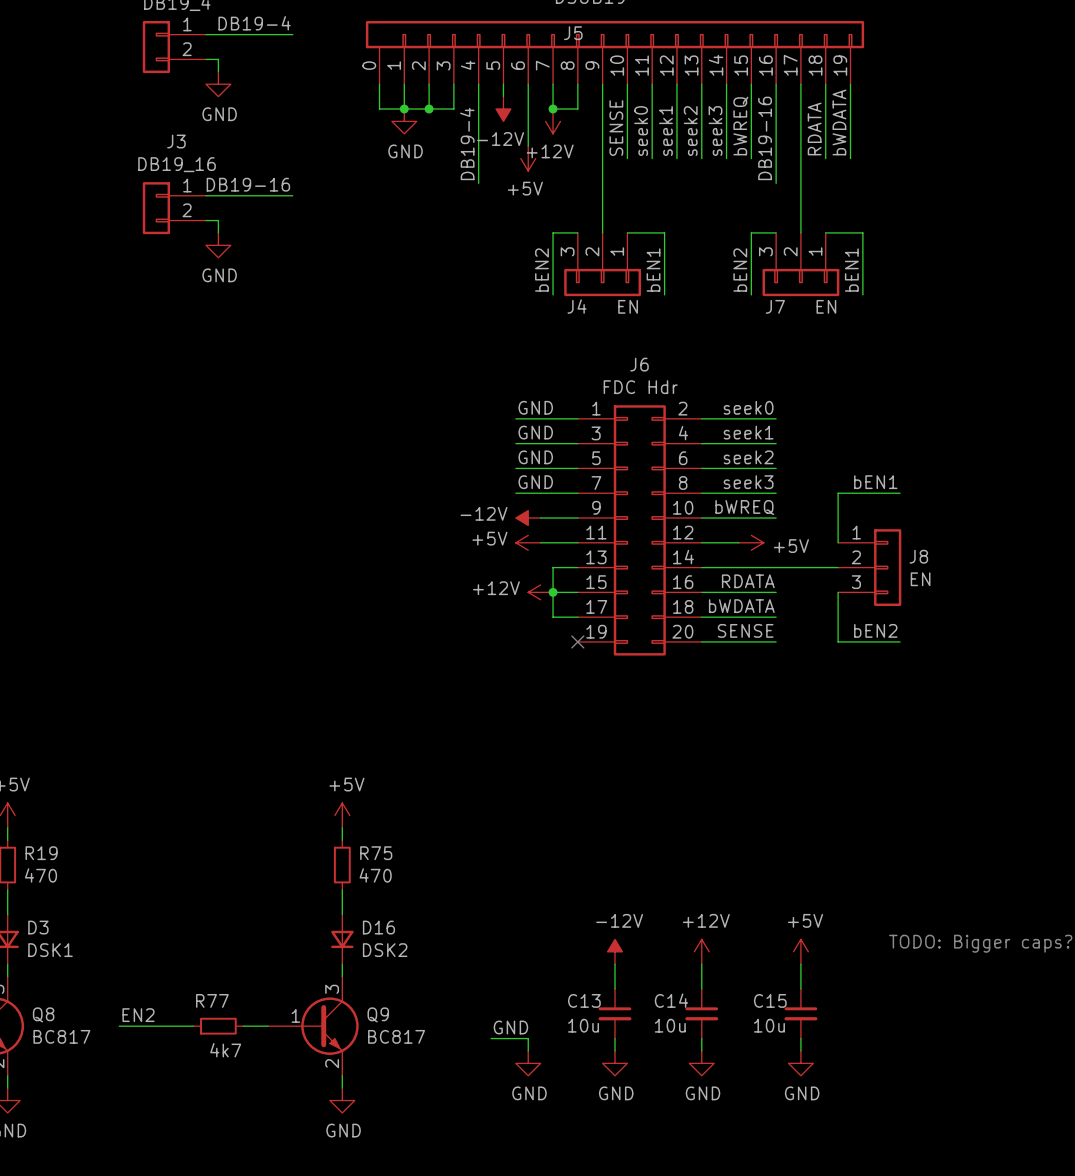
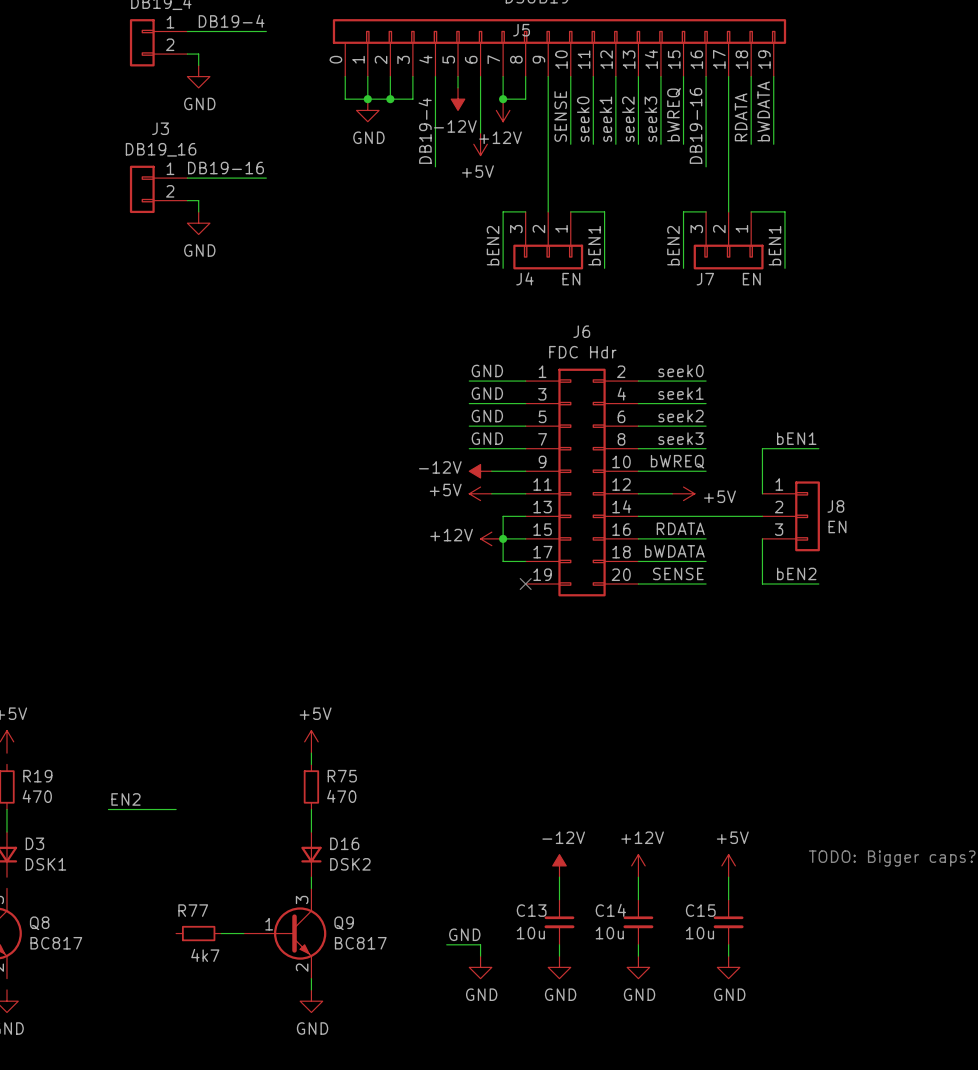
wire: (7, 827) (7, 840) -> none
wire: (7, 964) (7, 976) -> none
label position: EN2 (138, 1015) -> EN2 (126, 799)
wire: (119, 1026) (193, 1026) -> (108, 809) (176, 809)
wire: (7, 1075) (7, 1088) -> none

